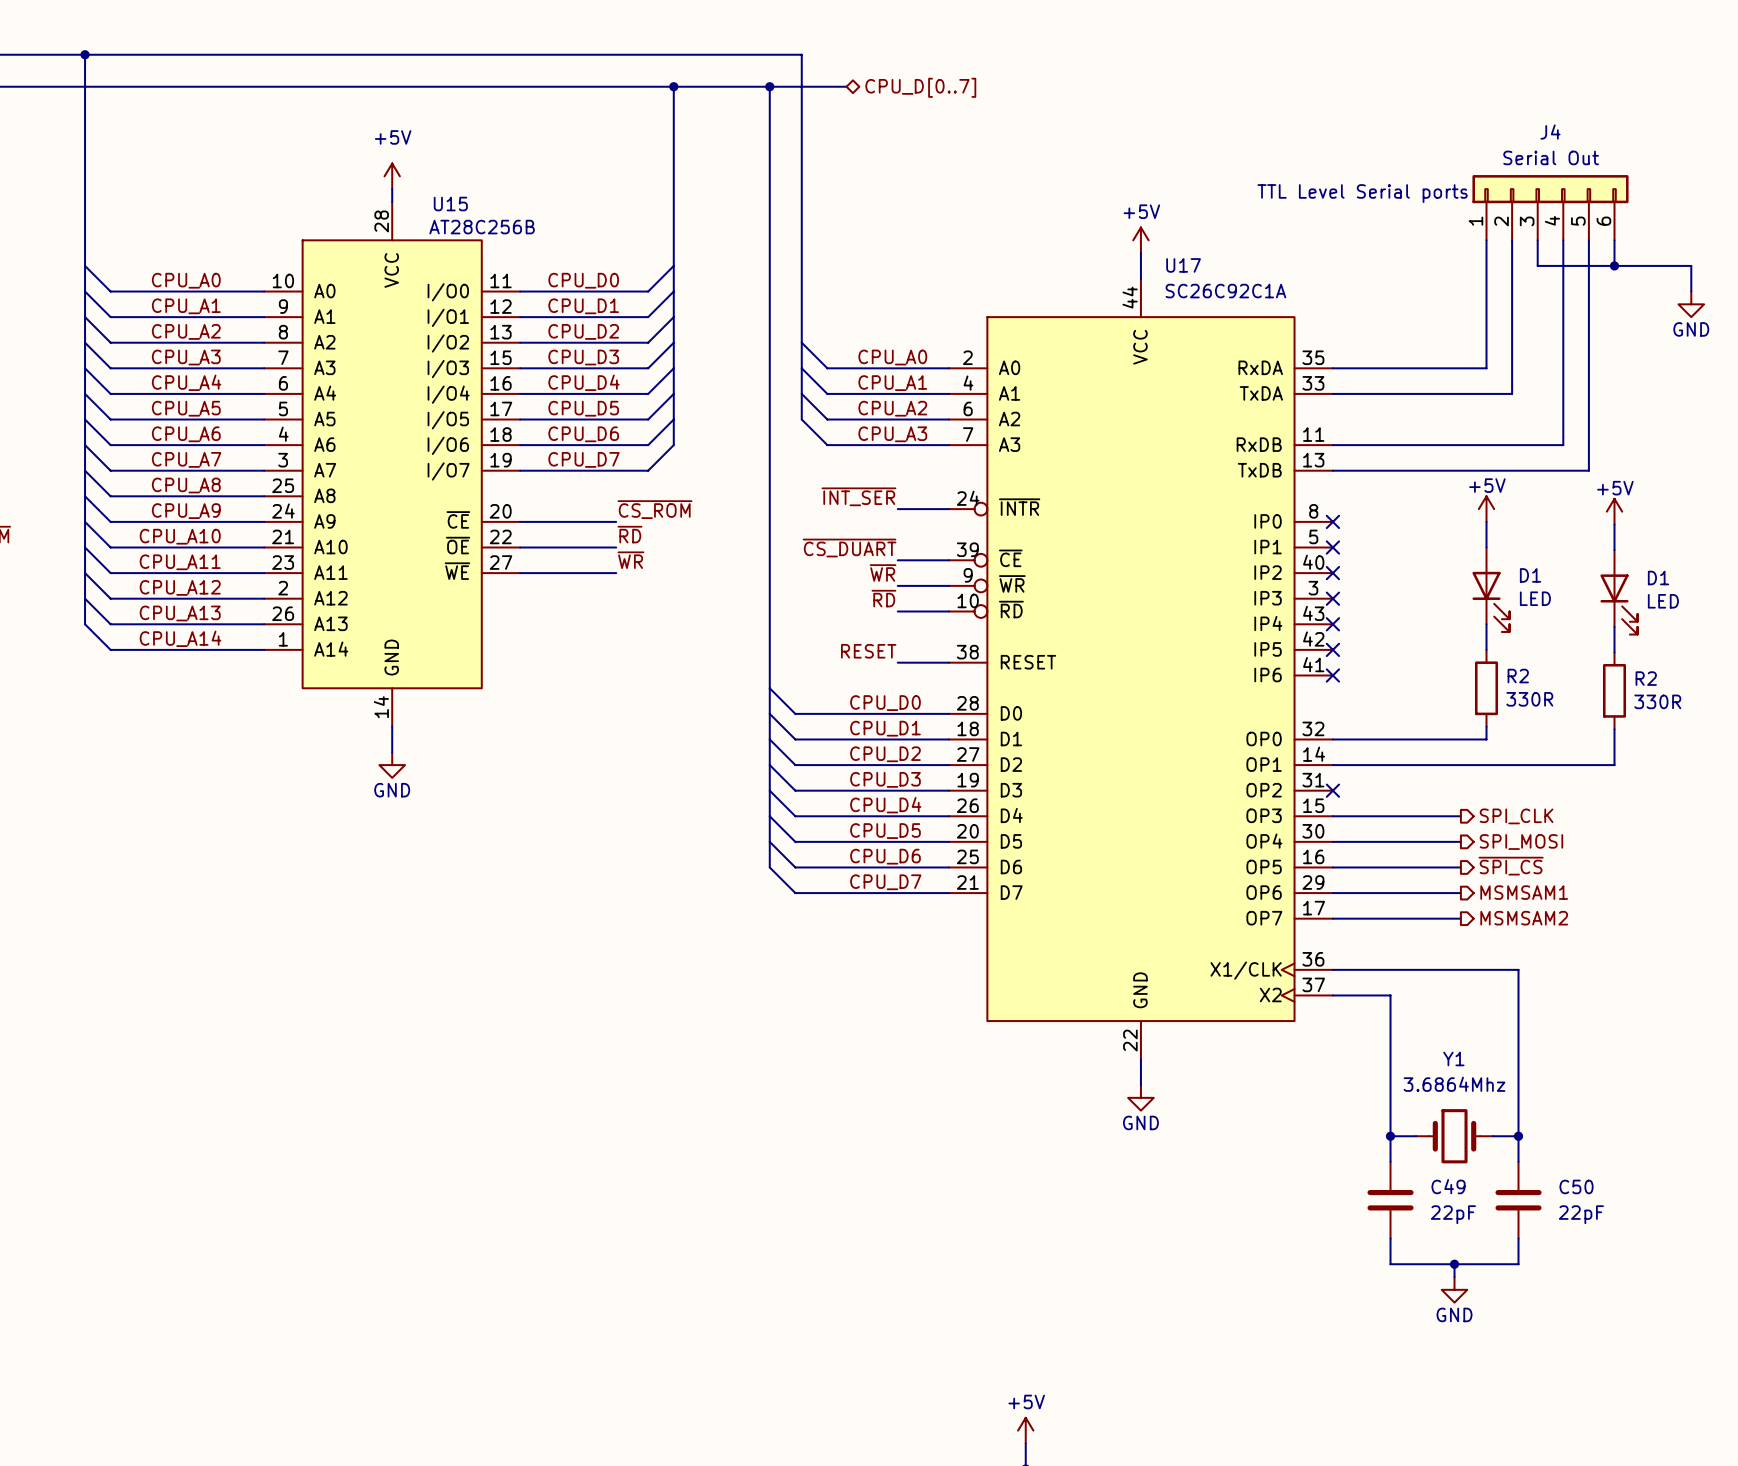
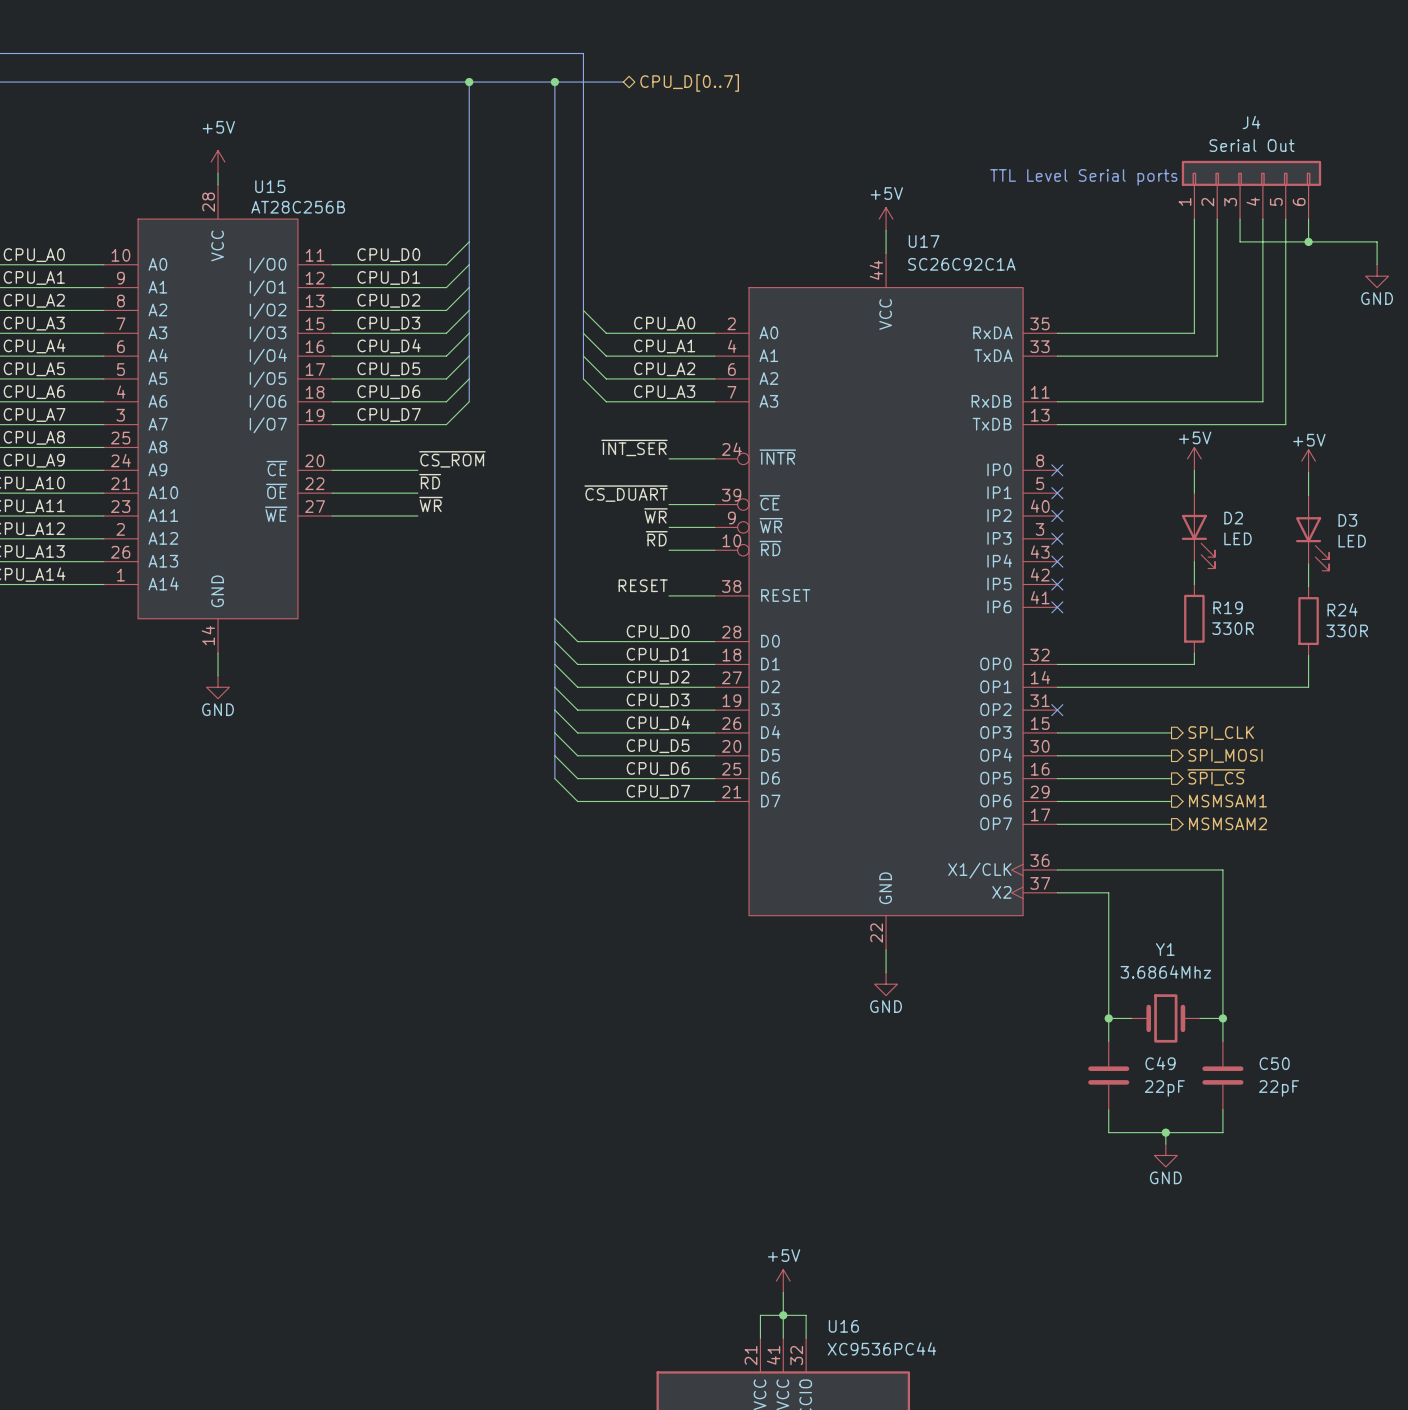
D1 name: D1 (1530, 575) -> D2 (1233, 518)
D1 name: D1 (1658, 578) -> D3 (1347, 520)
R2 name: R2 (1518, 676) -> R19 (1228, 607)
R2 name: R2 (1646, 678) -> R24 (1342, 609)

